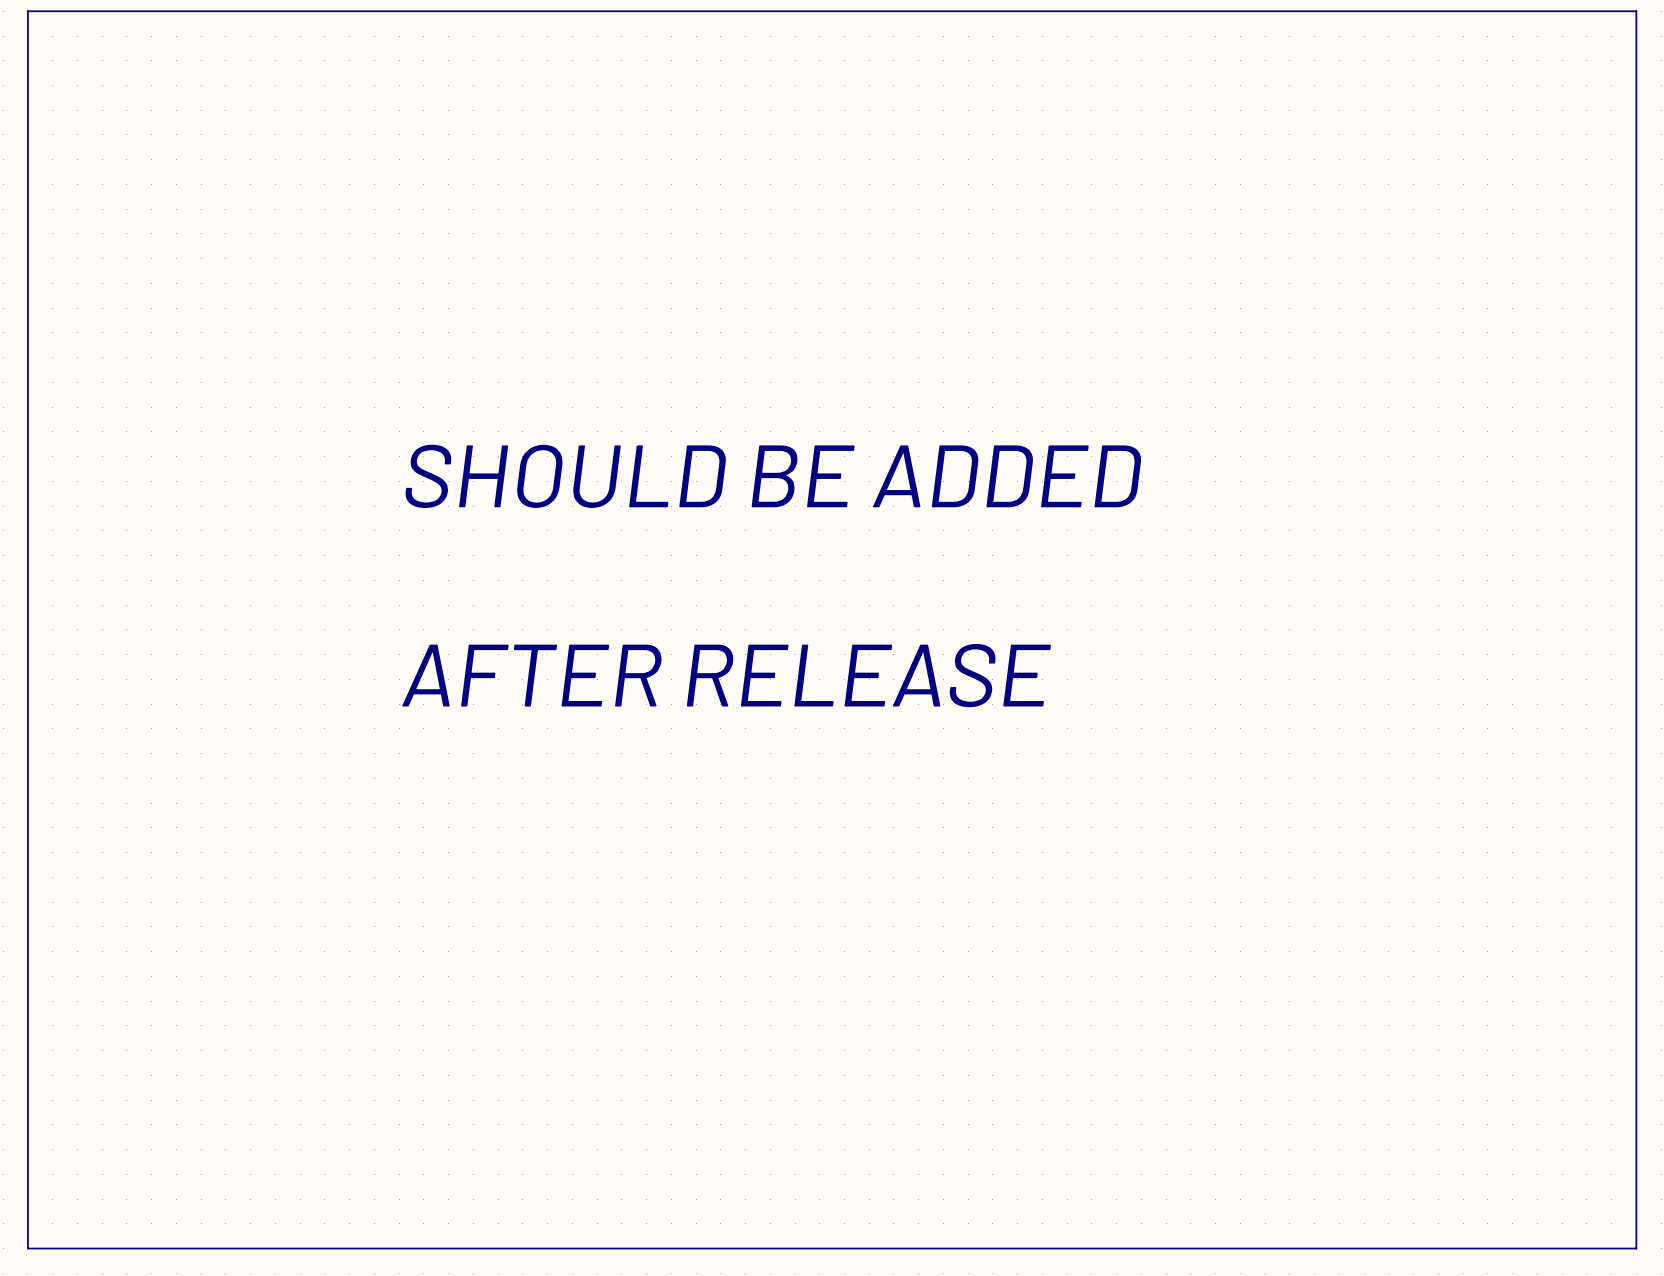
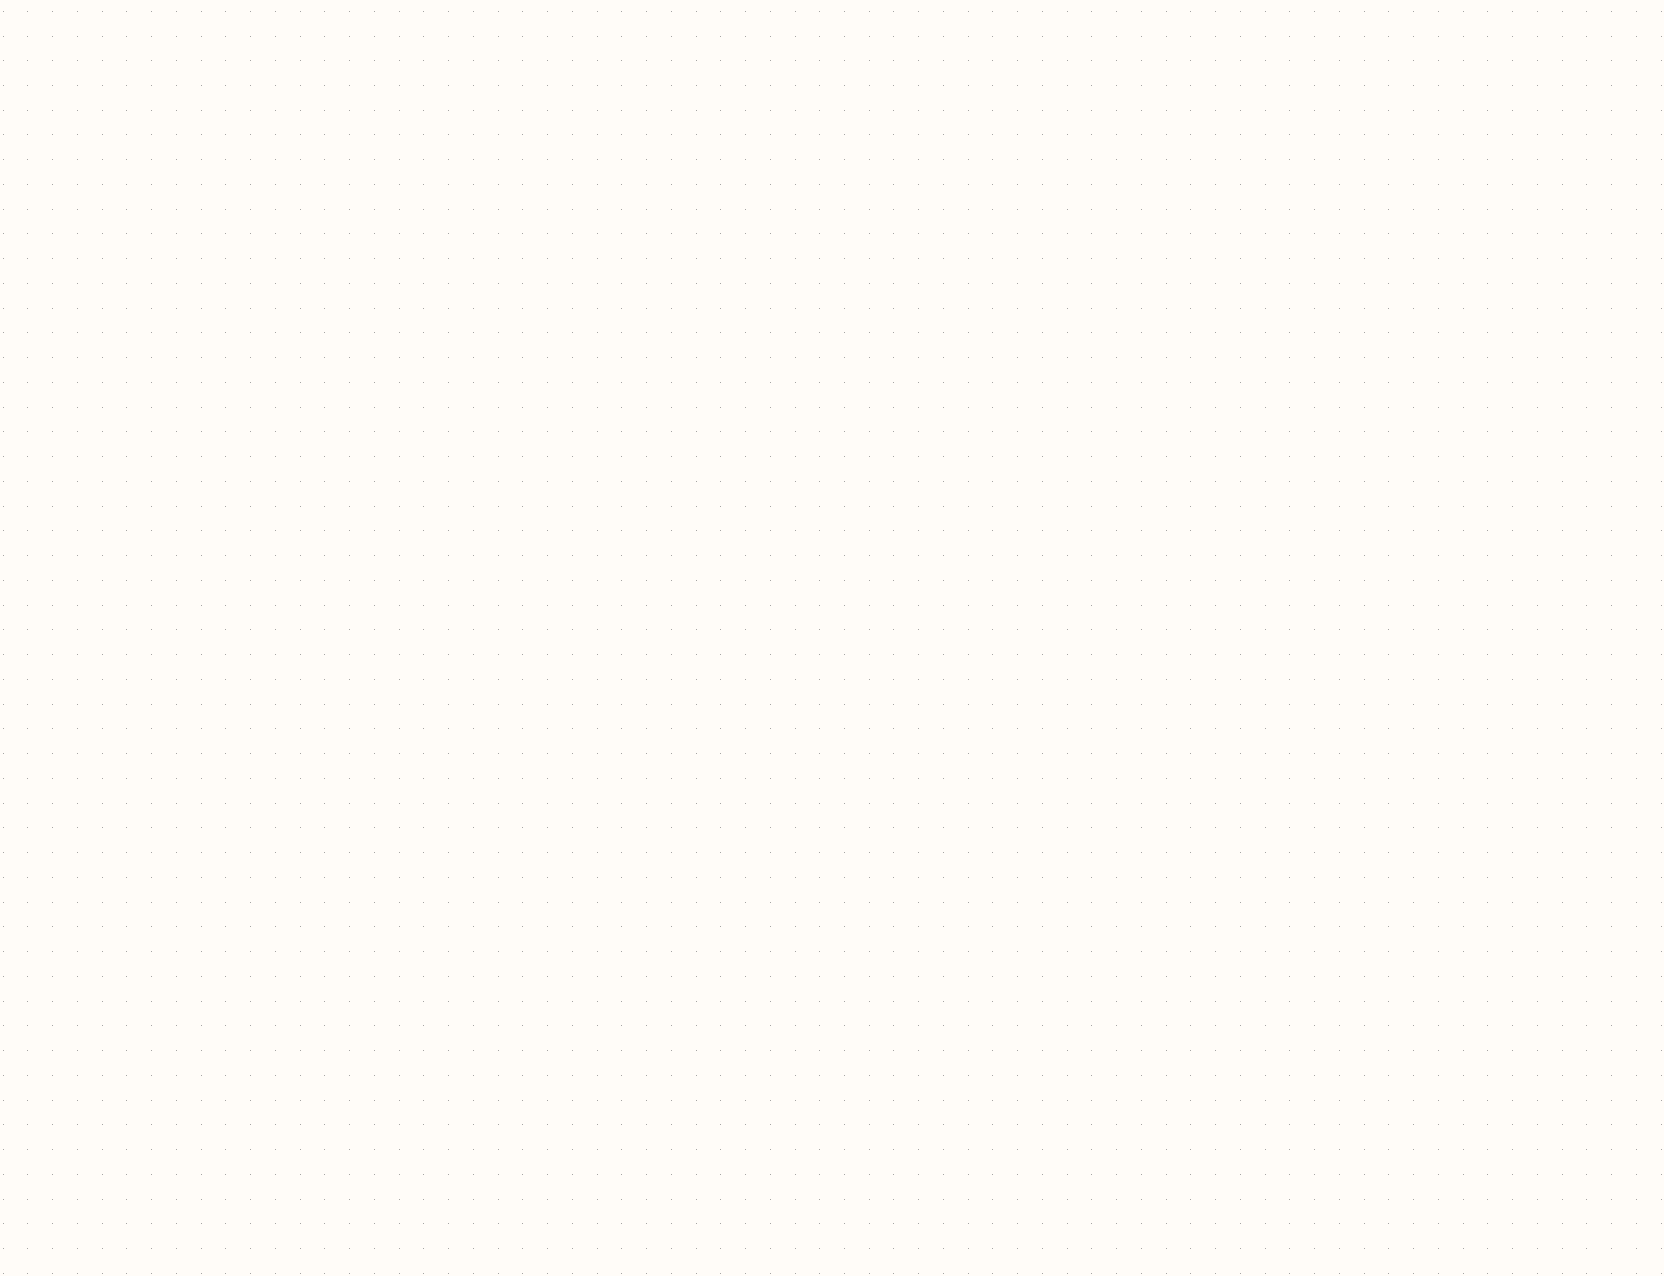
line: (27, 11) (1636, 11) (1636, 1248) (27, 1248) (27, 11) -> none
text: SHOULD BE ADDED (773, 476) -> none
text: AFTER RELEASE (726, 675) -> none

